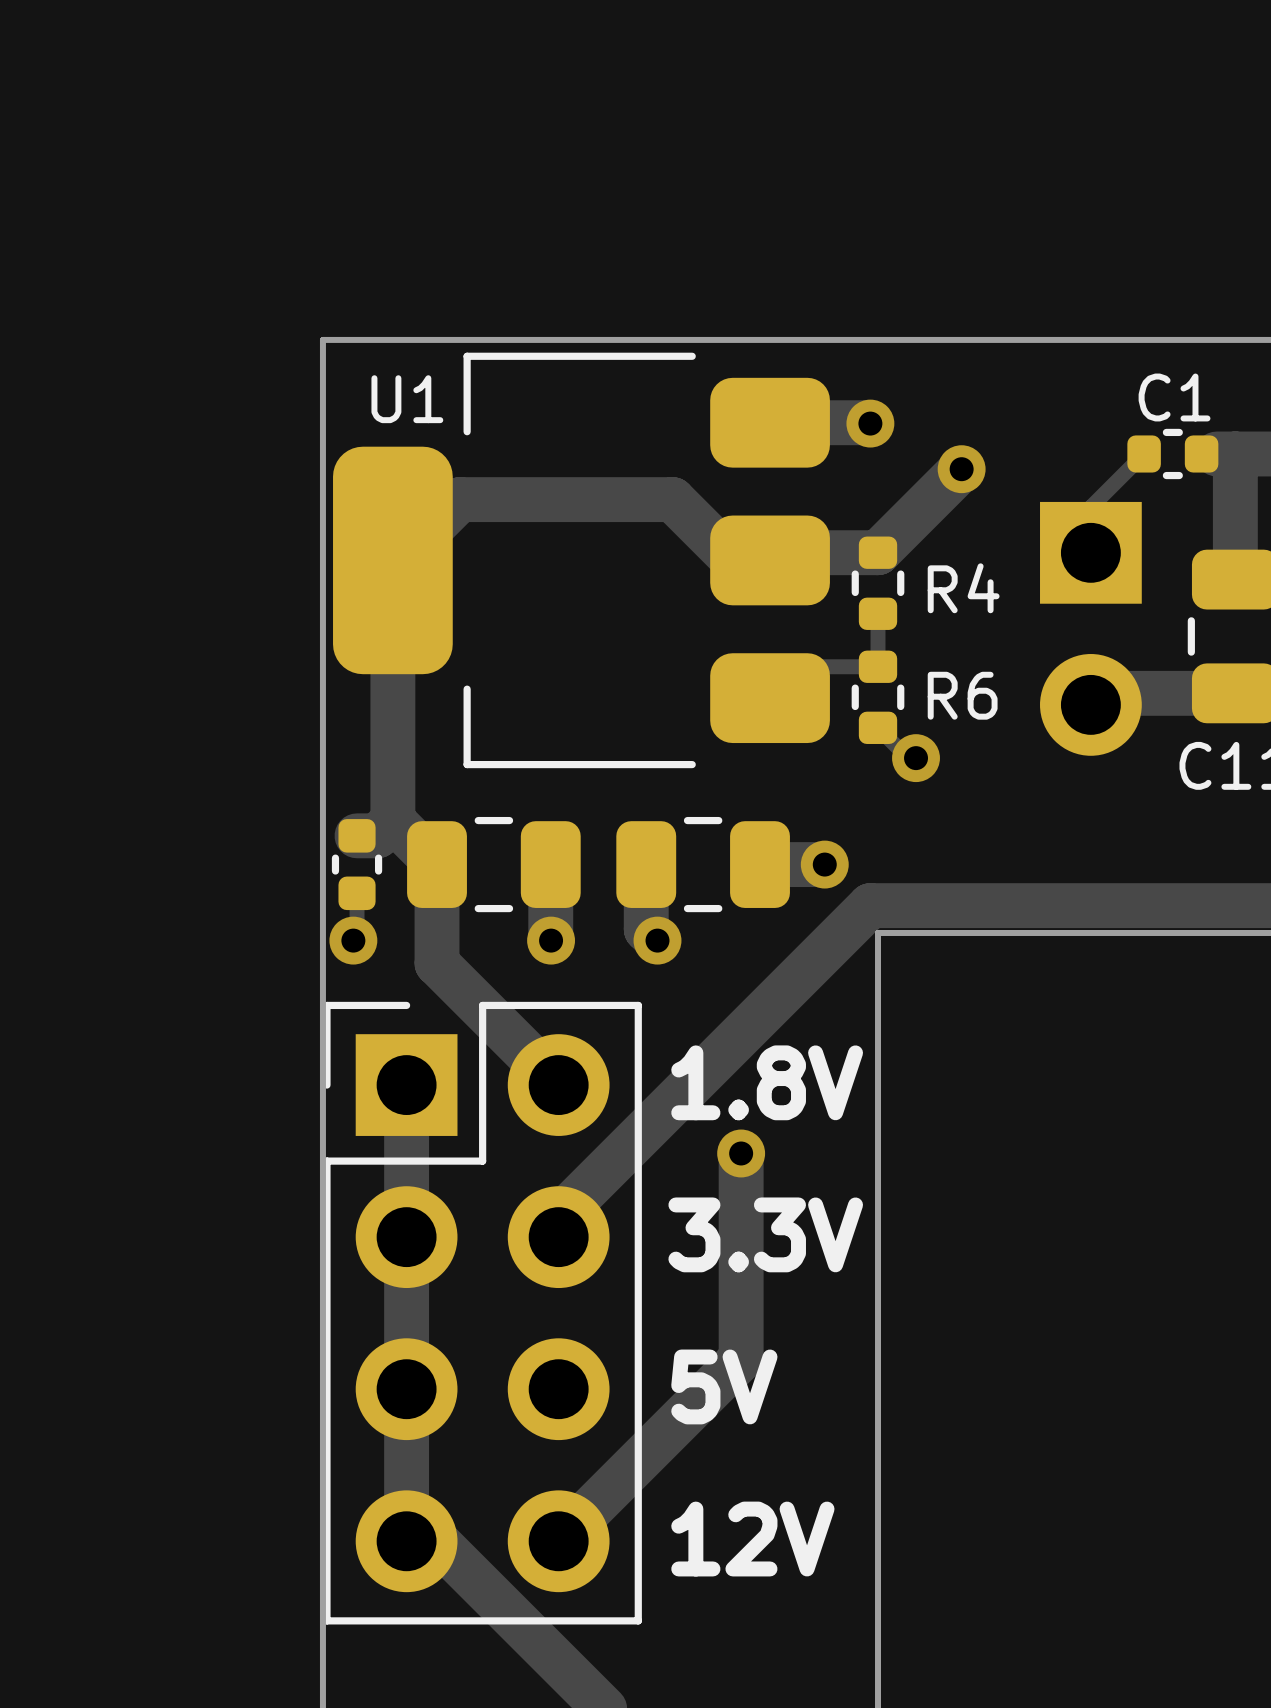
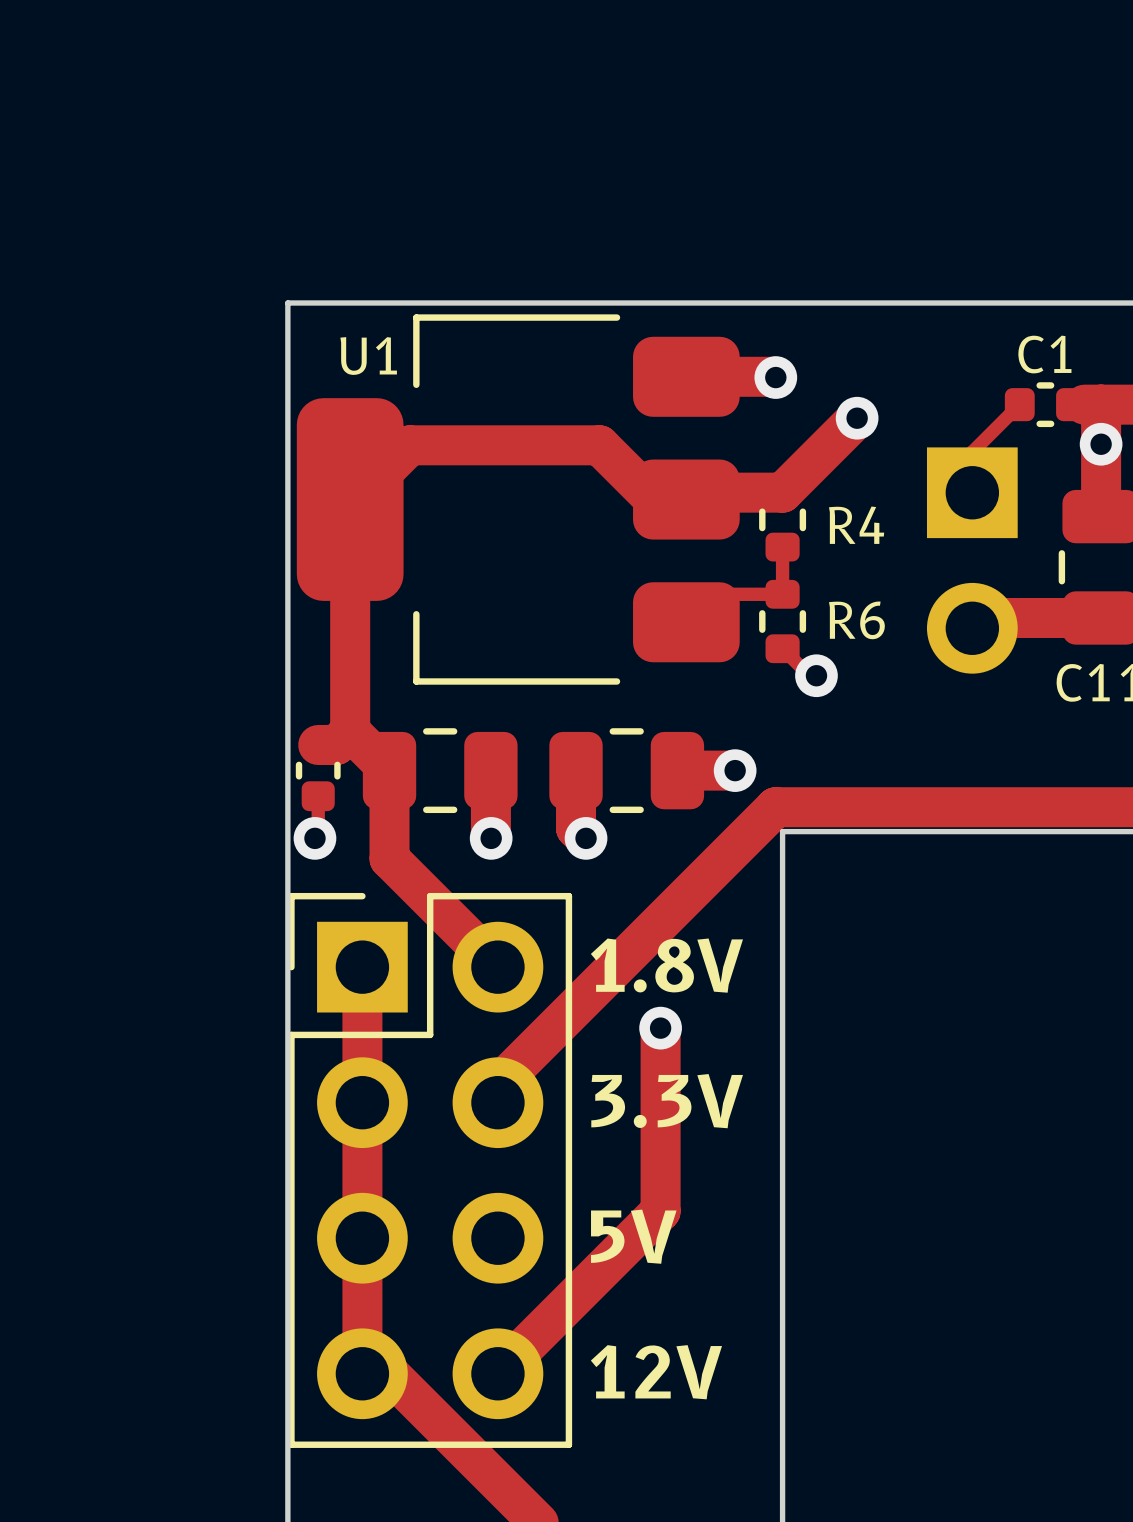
via: none -> (1101, 444)

